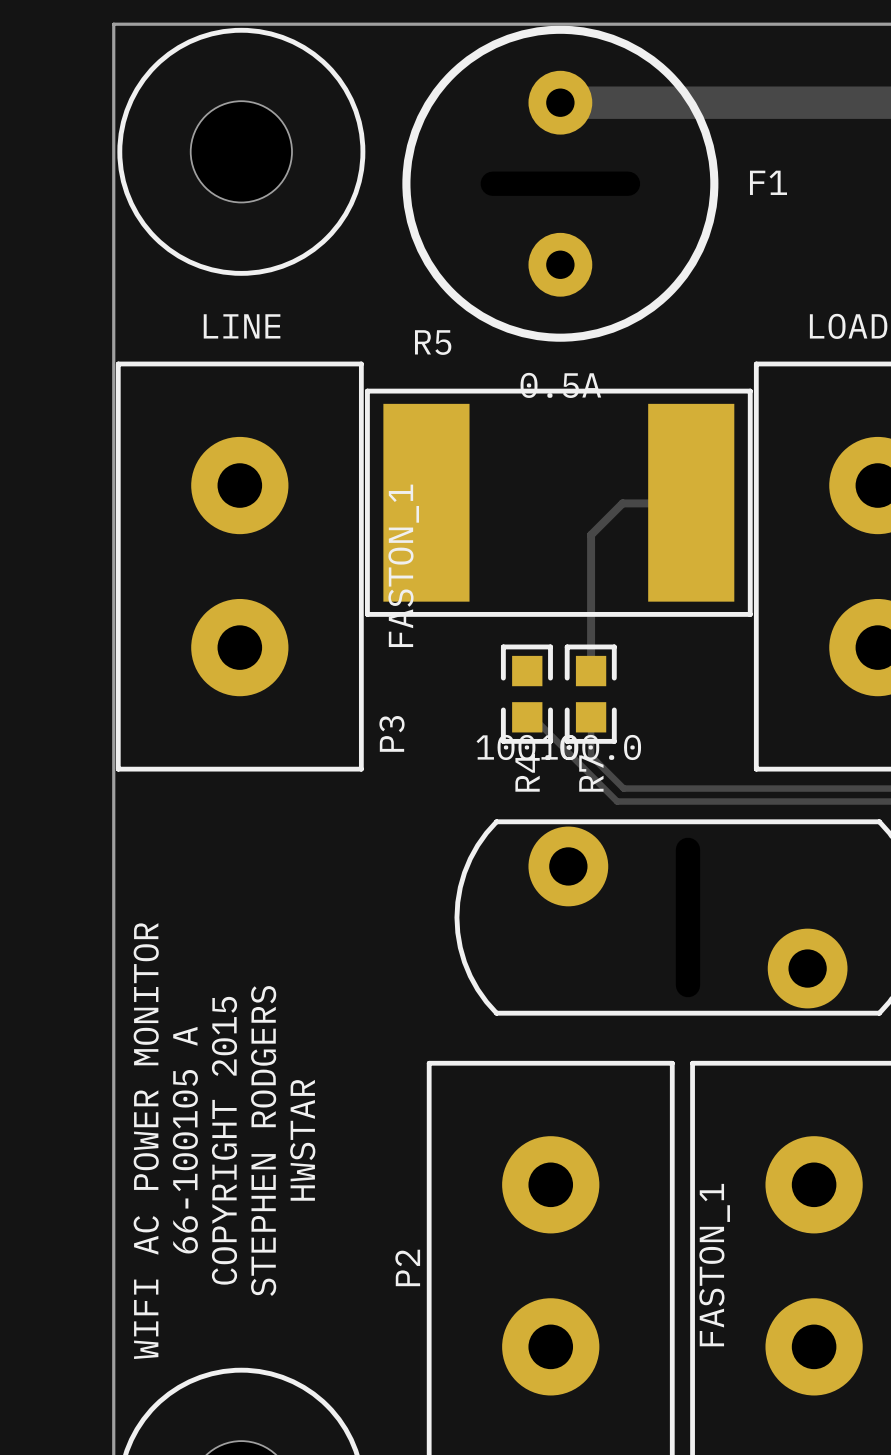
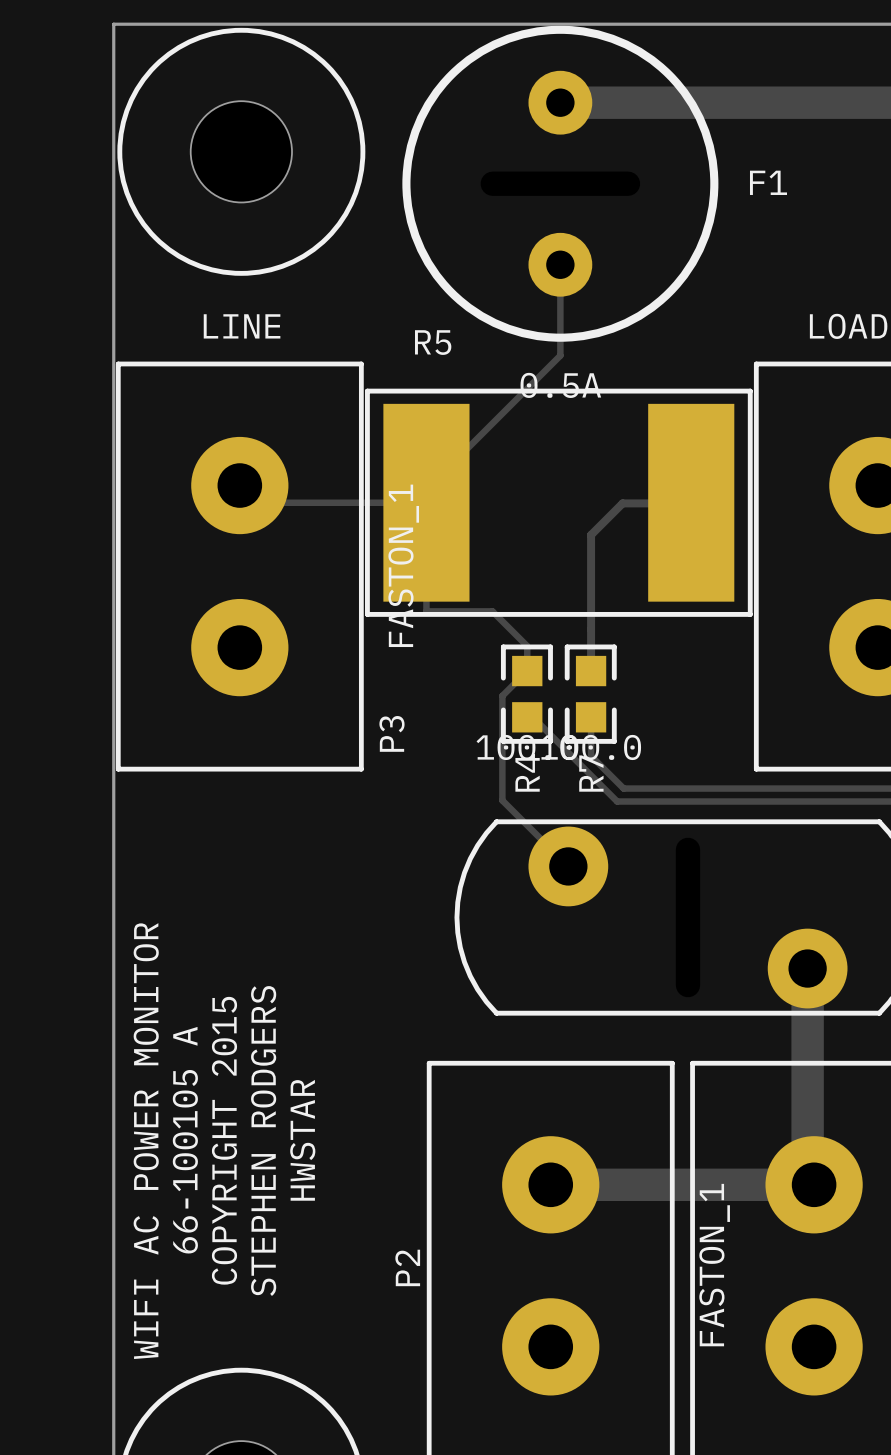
track: none -> (560, 264) (560, 355) (413, 502)
track: none -> (239, 502) (426, 502) (426, 611) (492, 611) (527, 646) (527, 671) (502, 695) (502, 800) (568, 866)
track: none -> (807, 968) (807, 1184)
track: none -> (550, 1184) (814, 1184)

